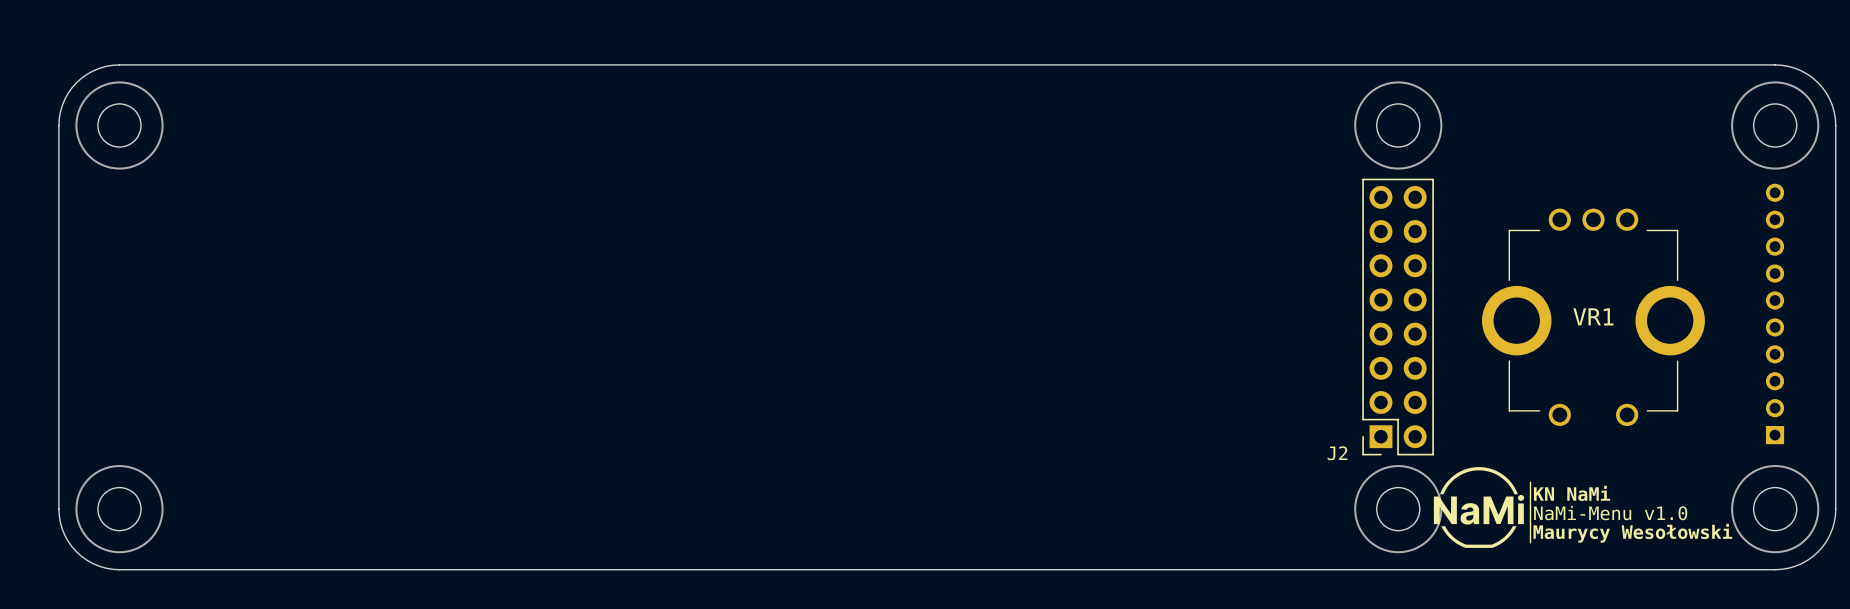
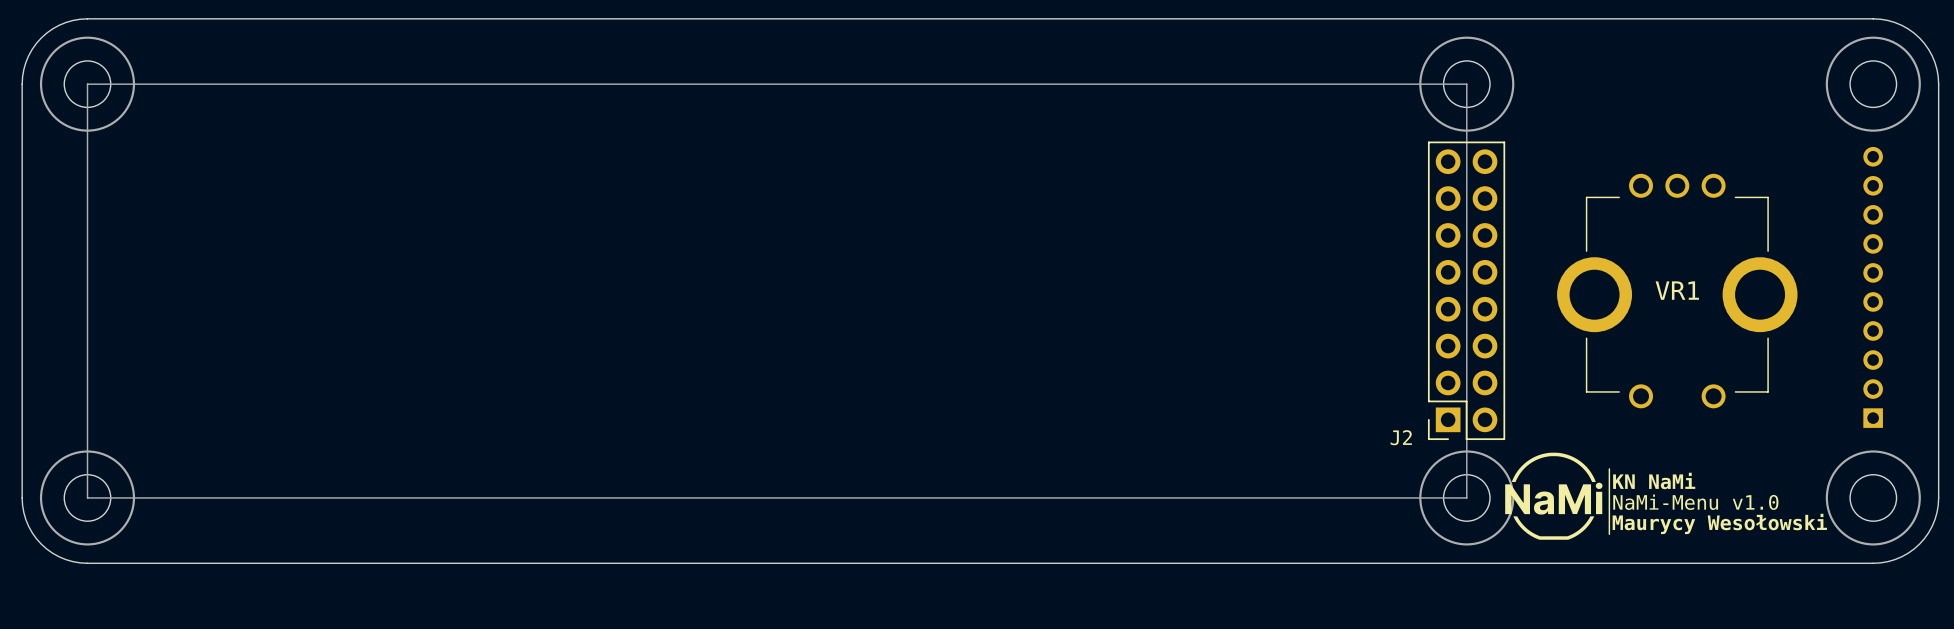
line: none -> (87, 84) (1466, 84) (1466, 497) (87, 497) (87, 84)

